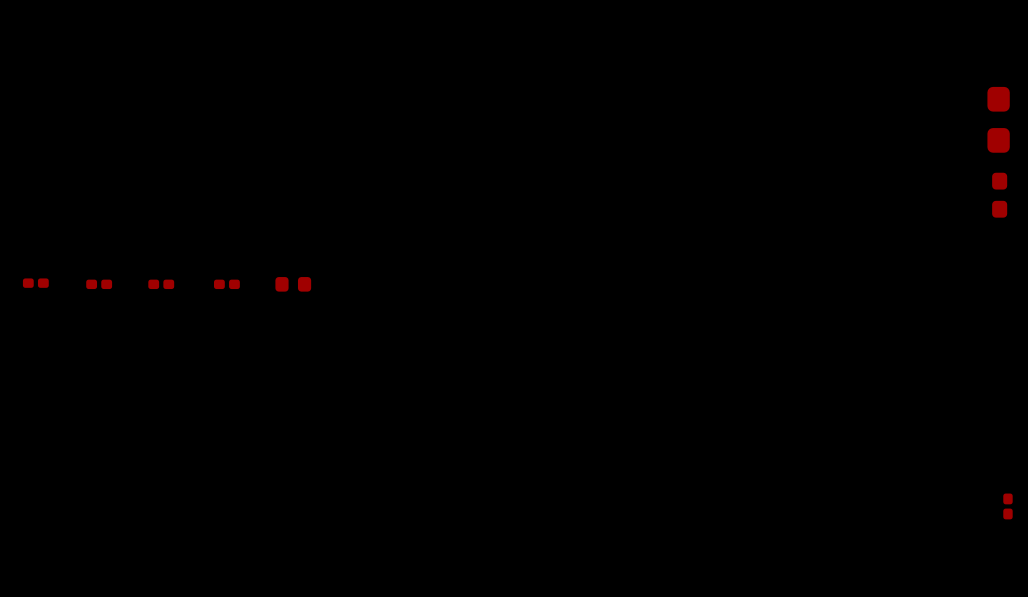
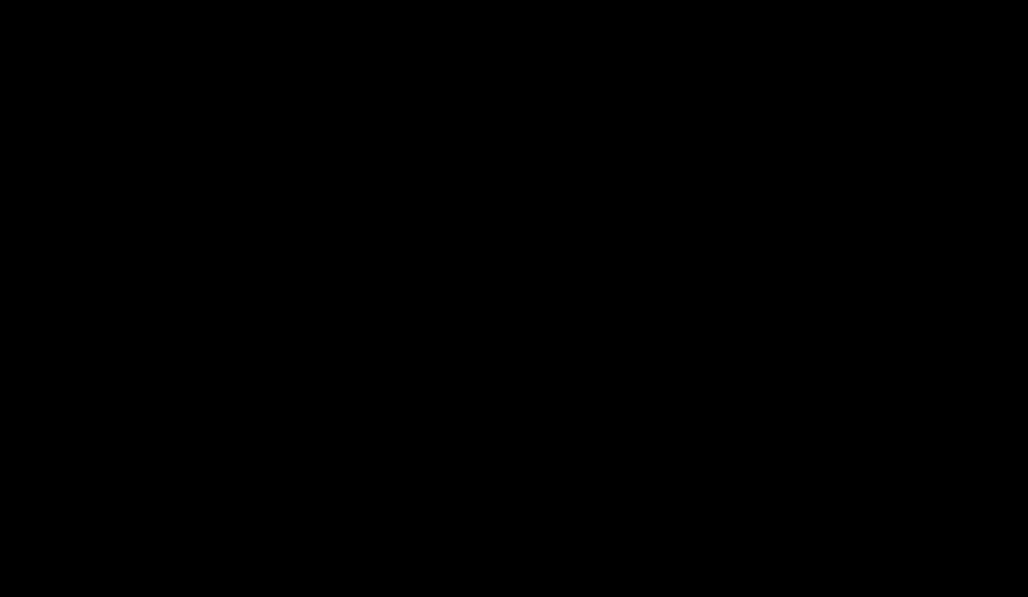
part: (998, 119) -> none
part: (999, 195) -> none
part: (35, 283) -> none
part: (99, 284) -> none
part: (161, 284) -> none
part: (226, 284) -> none
part: (293, 284) -> none
part: (1007, 506) -> none

